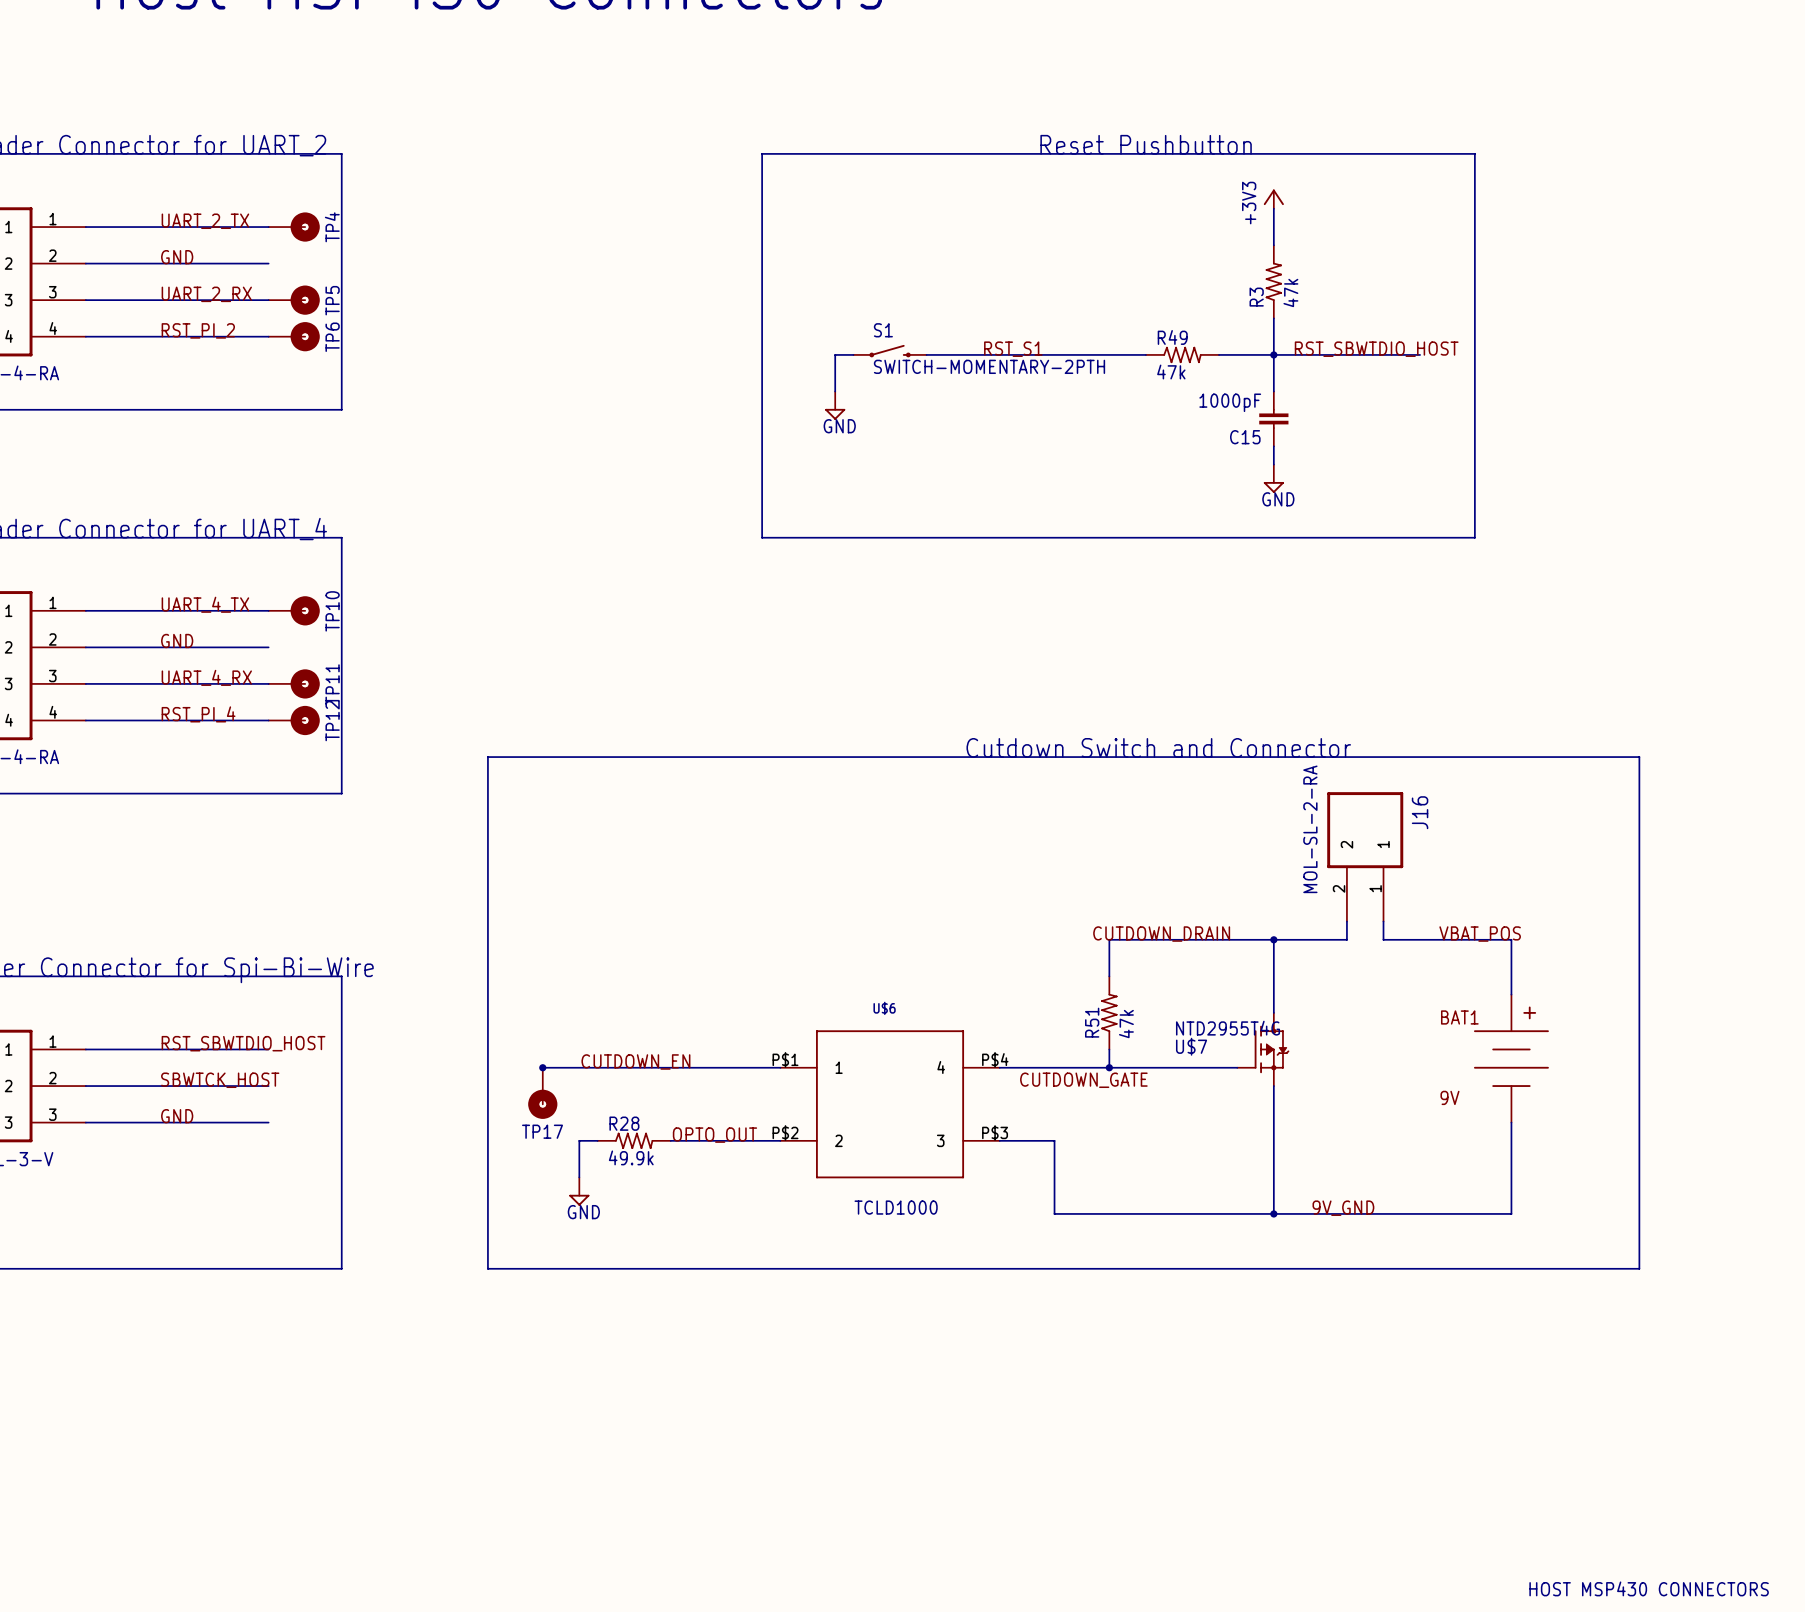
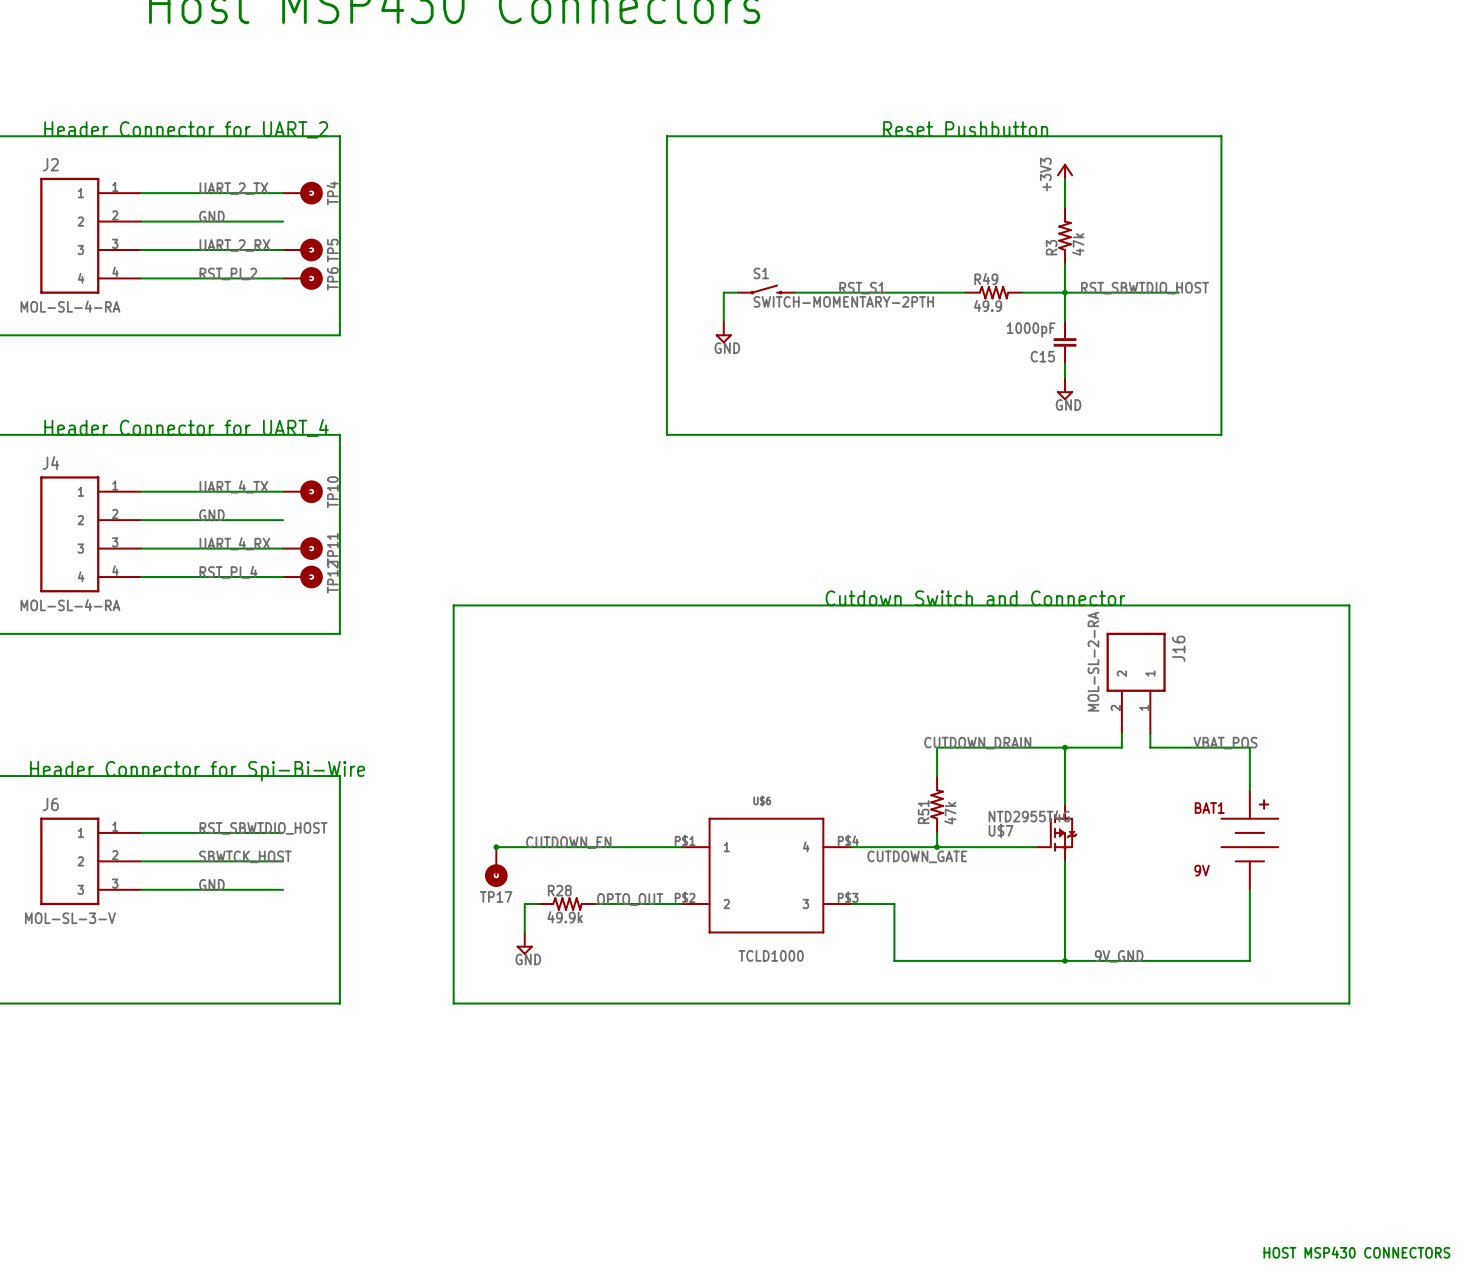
R49 value: 47k (1171, 372) -> 49.9 (988, 305)

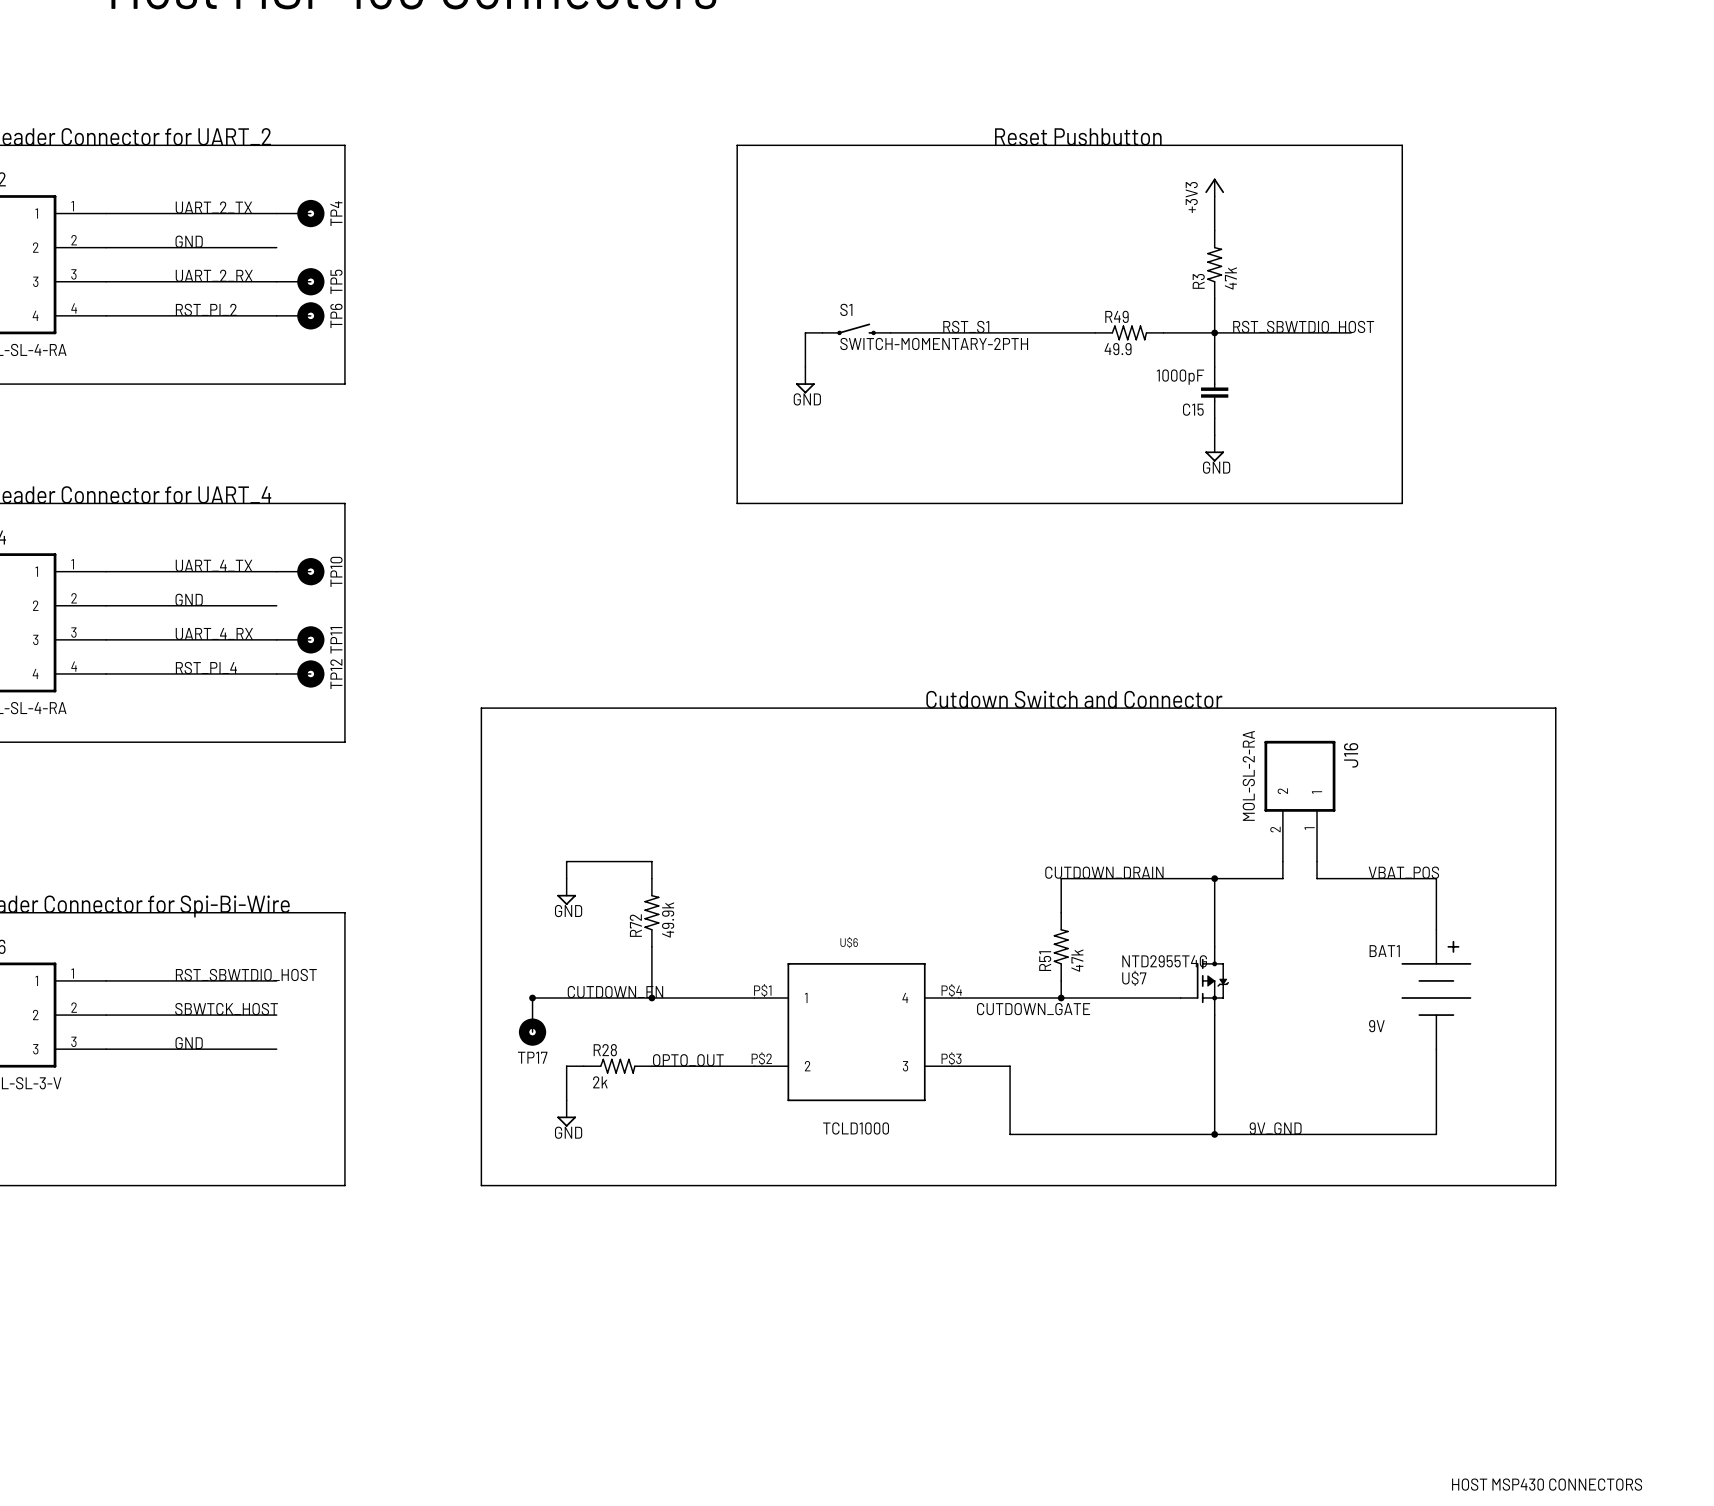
wire: none -> (566, 878) (566, 861) (651, 861) (651, 878)
power symbol: none -> GND (566, 891)
R72: none -> 49.9k (651, 912)
wire: none -> (651, 946) (651, 998)
junction: none -> (651, 998)
R28 value: 49.9k (565, 917) -> 2k (600, 1082)

